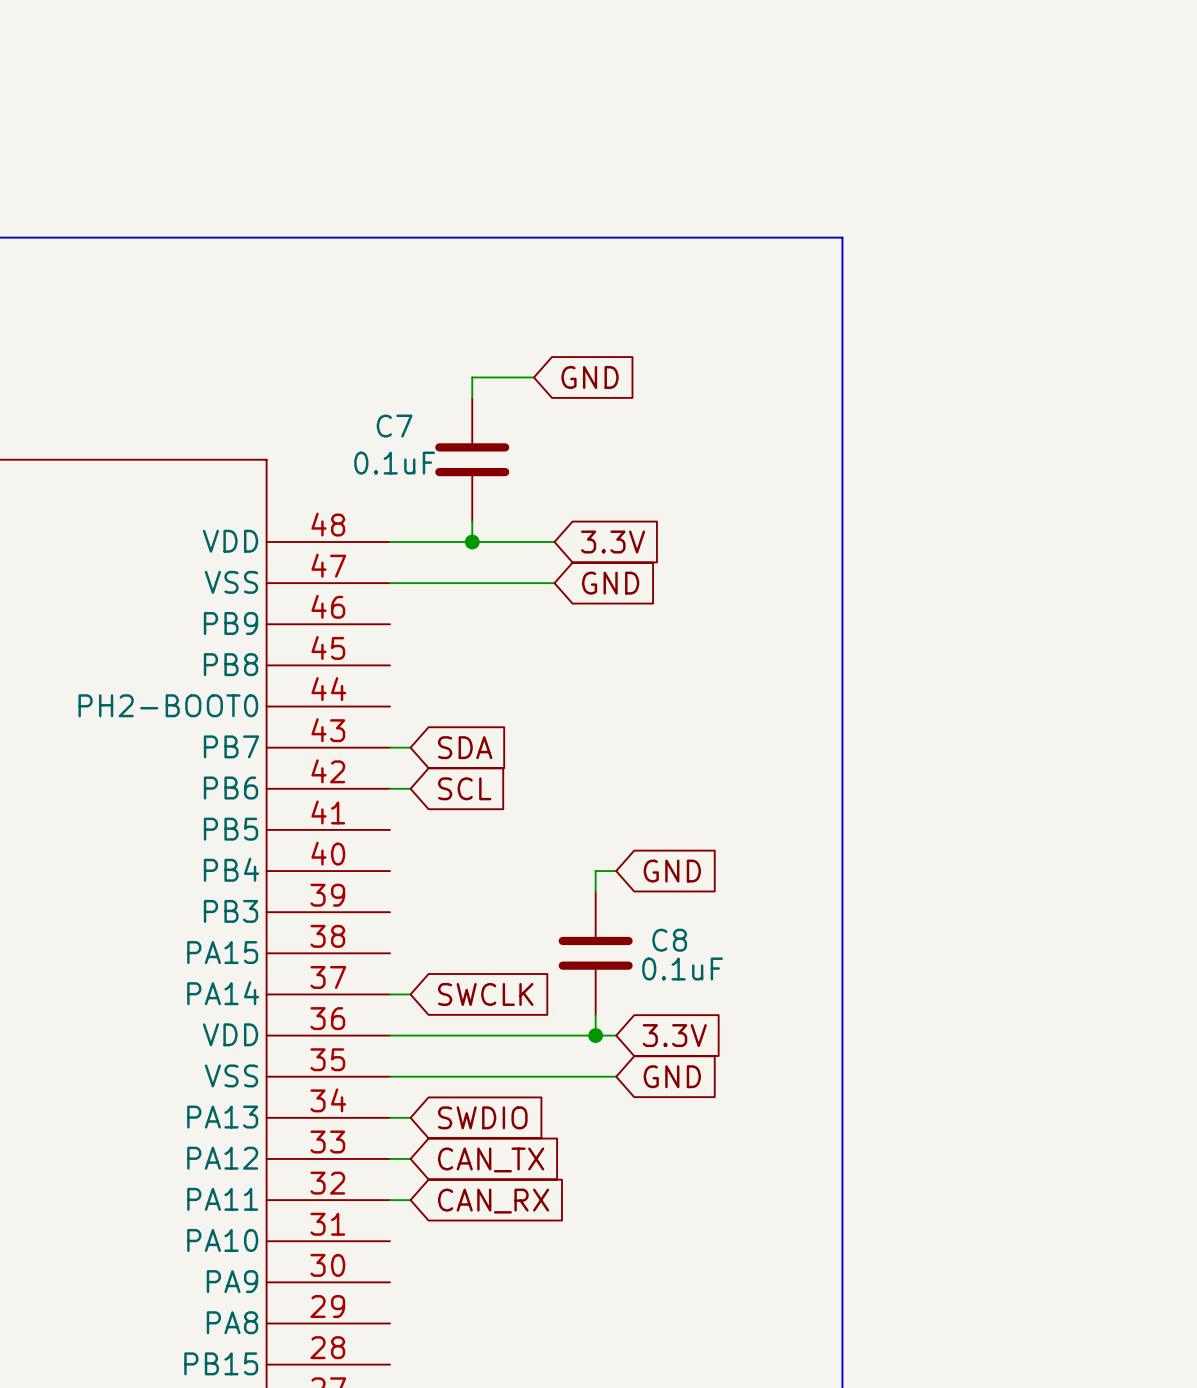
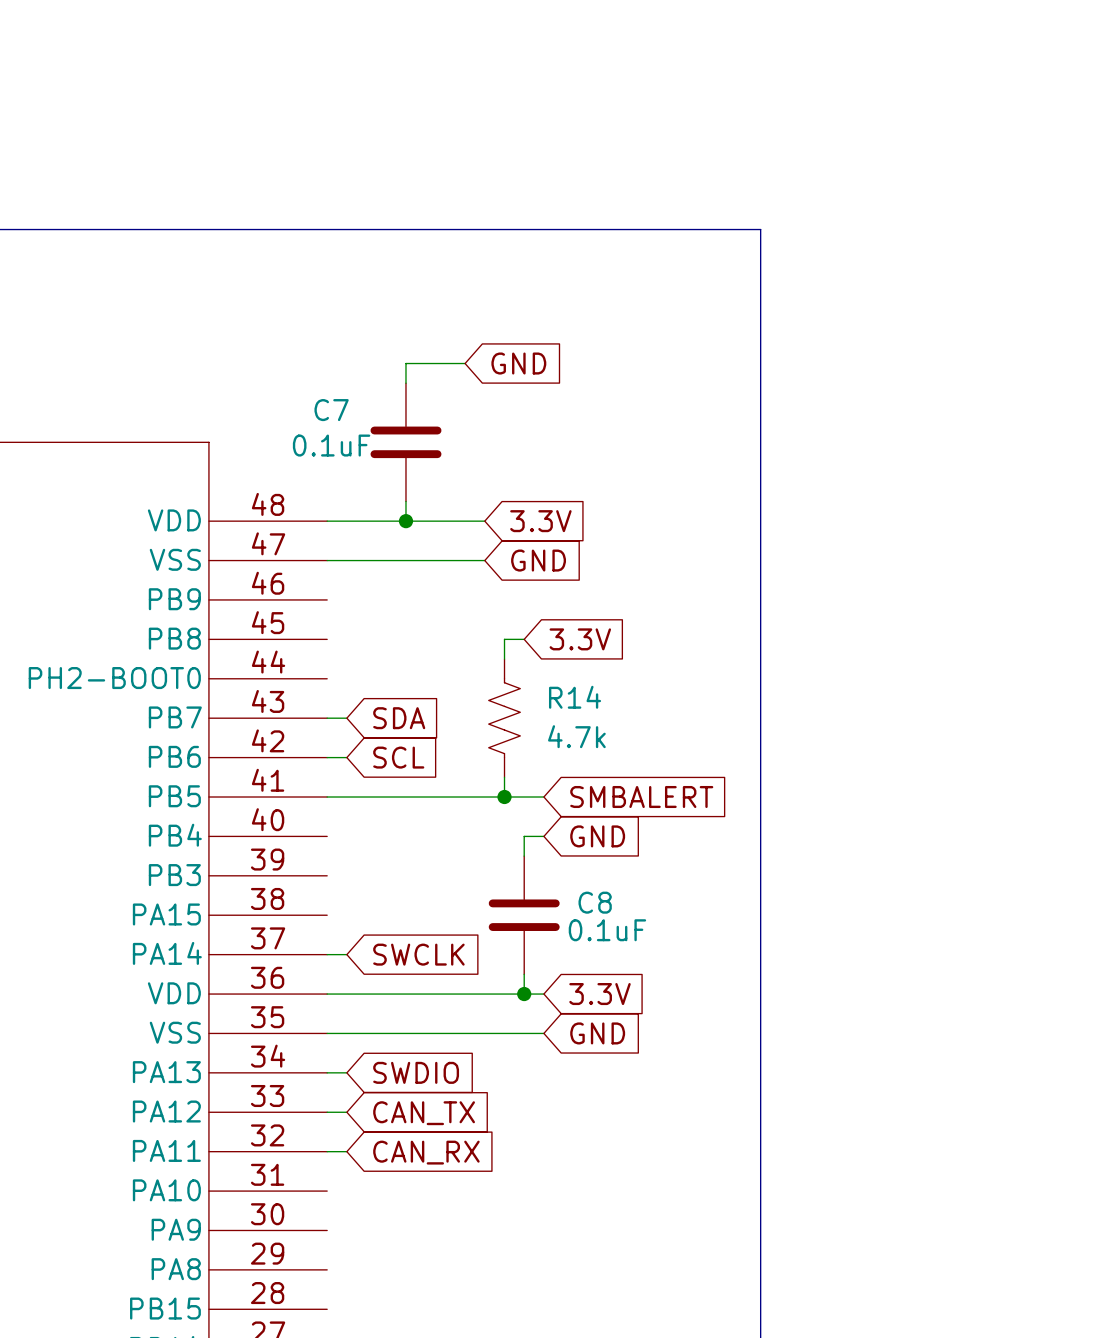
wire: none -> (524, 639) (504, 639) (504, 659)
global label: none -> 3.3V (580, 639)
R14: none -> 4.7k (504, 718)
wire: none -> (504, 777) (504, 797)
wire: none -> (327, 797) (543, 797)
junction: none -> (504, 797)
global label: none -> SMBALERT (641, 797)

